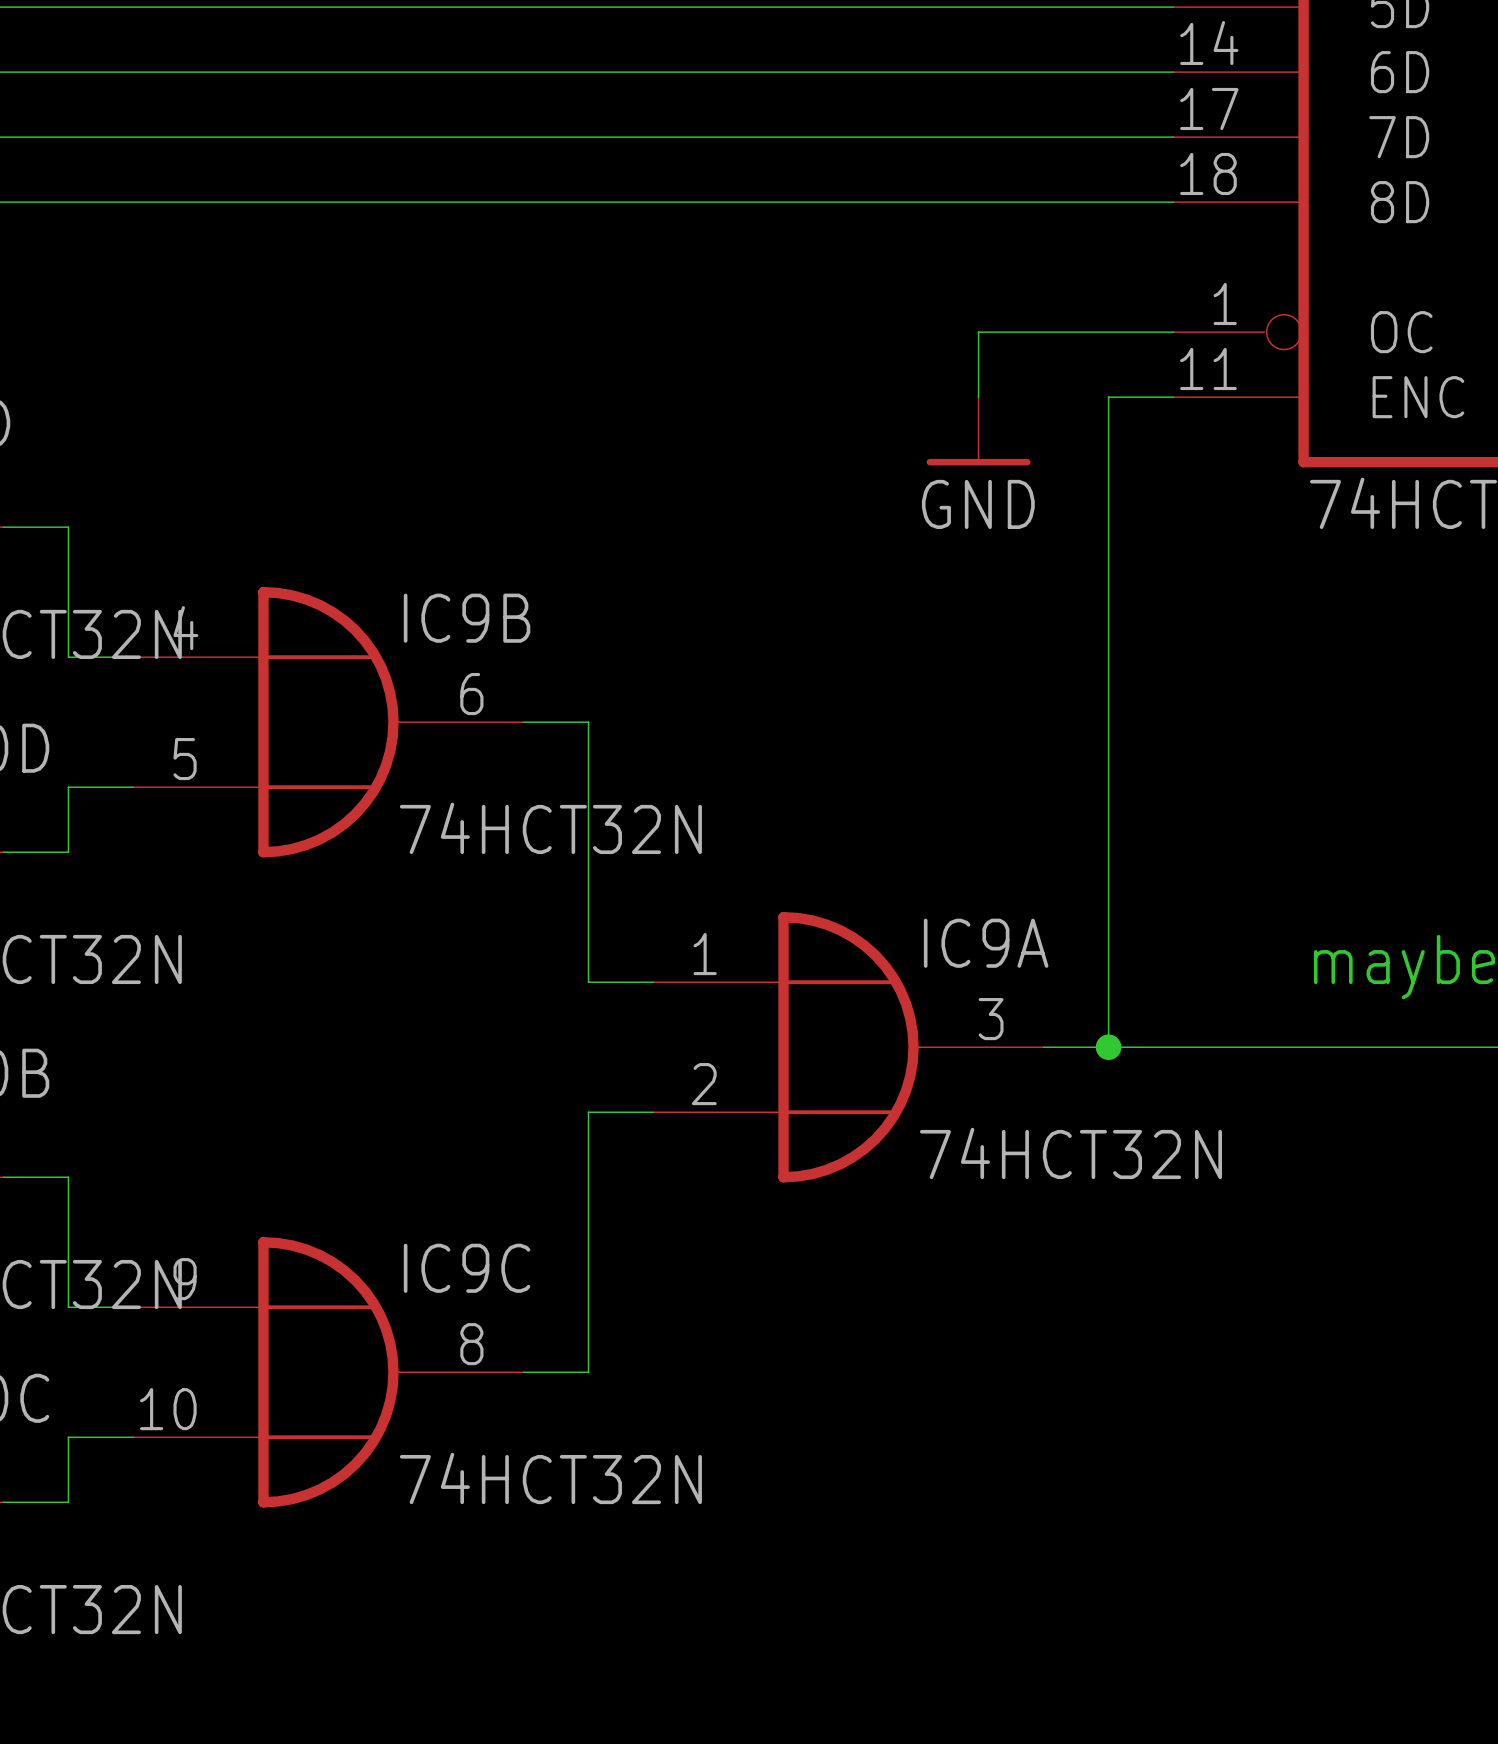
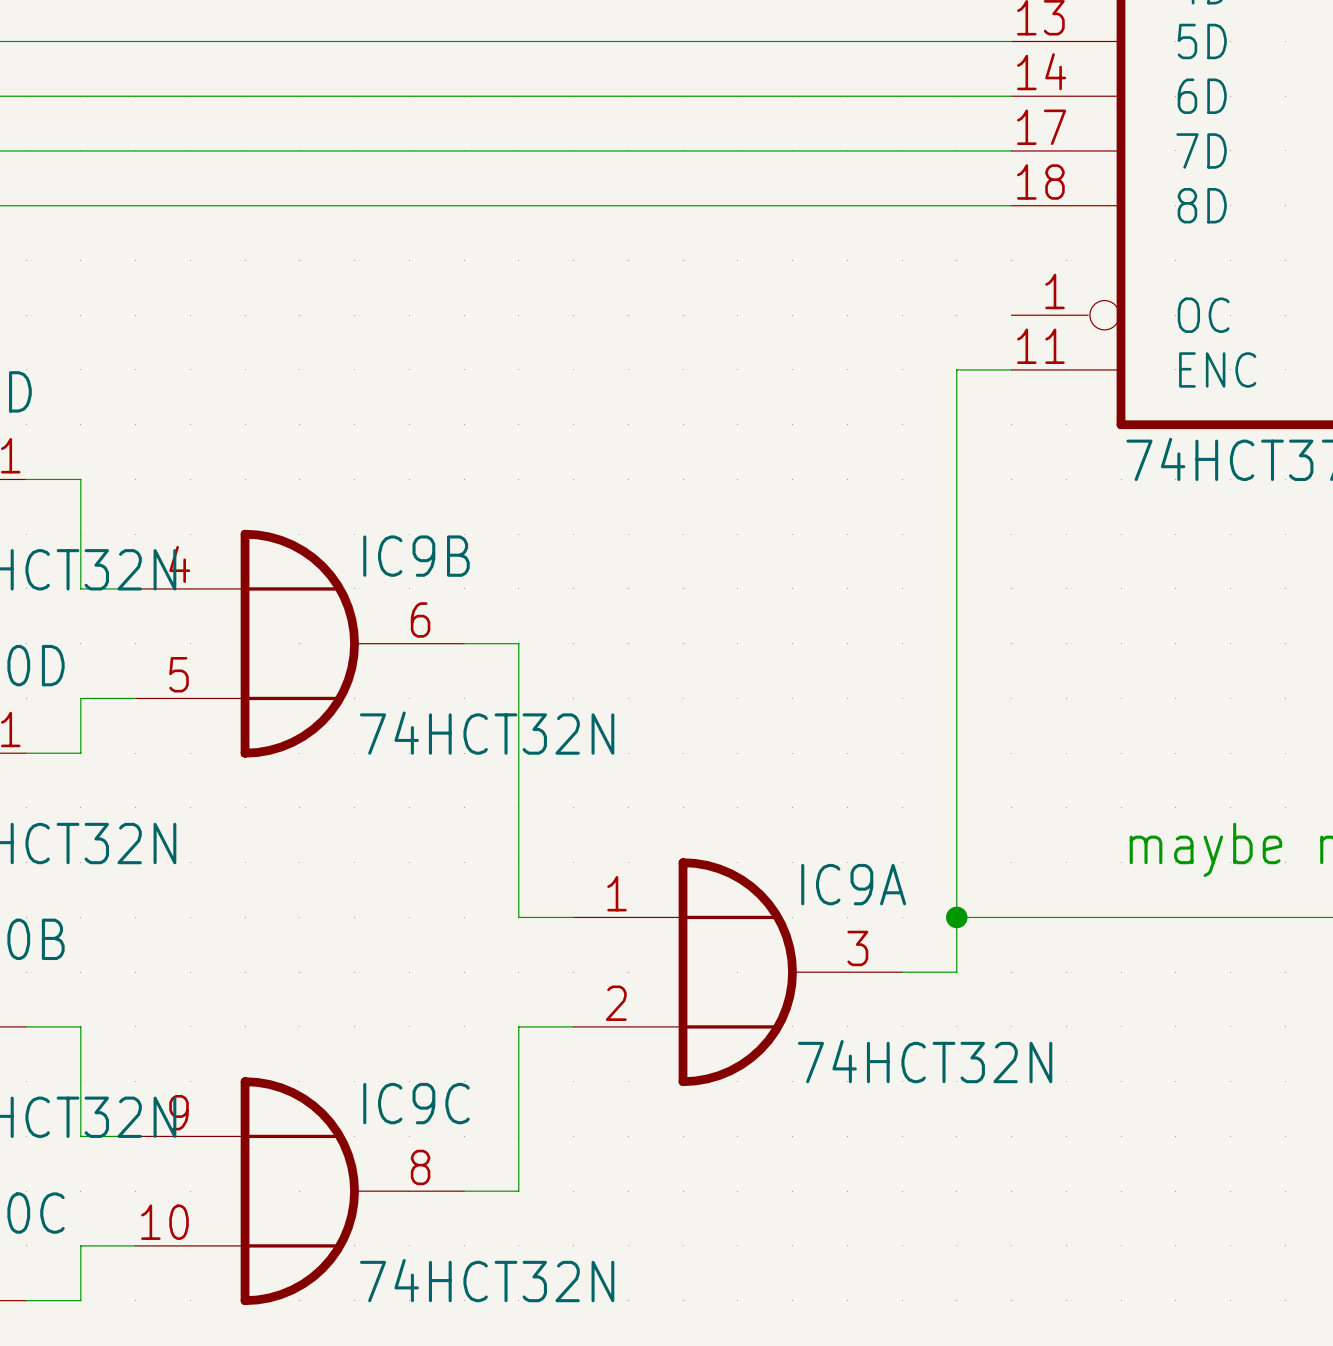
wire: (1173, 332) (978, 332) (978, 397) -> none
power symbol: GND (978, 431) -> none
wire: (588, 982) (653, 982) -> (518, 862) (518, 917) (573, 917)
IC9A position: (848, 1047) -> (737, 972)
wire: (1043, 1047) (1108, 1047) -> (902, 972) (956, 972) (956, 917)
wire: (653, 1112) (588, 1112) (588, 1177) -> (573, 1026) (518, 1026)

